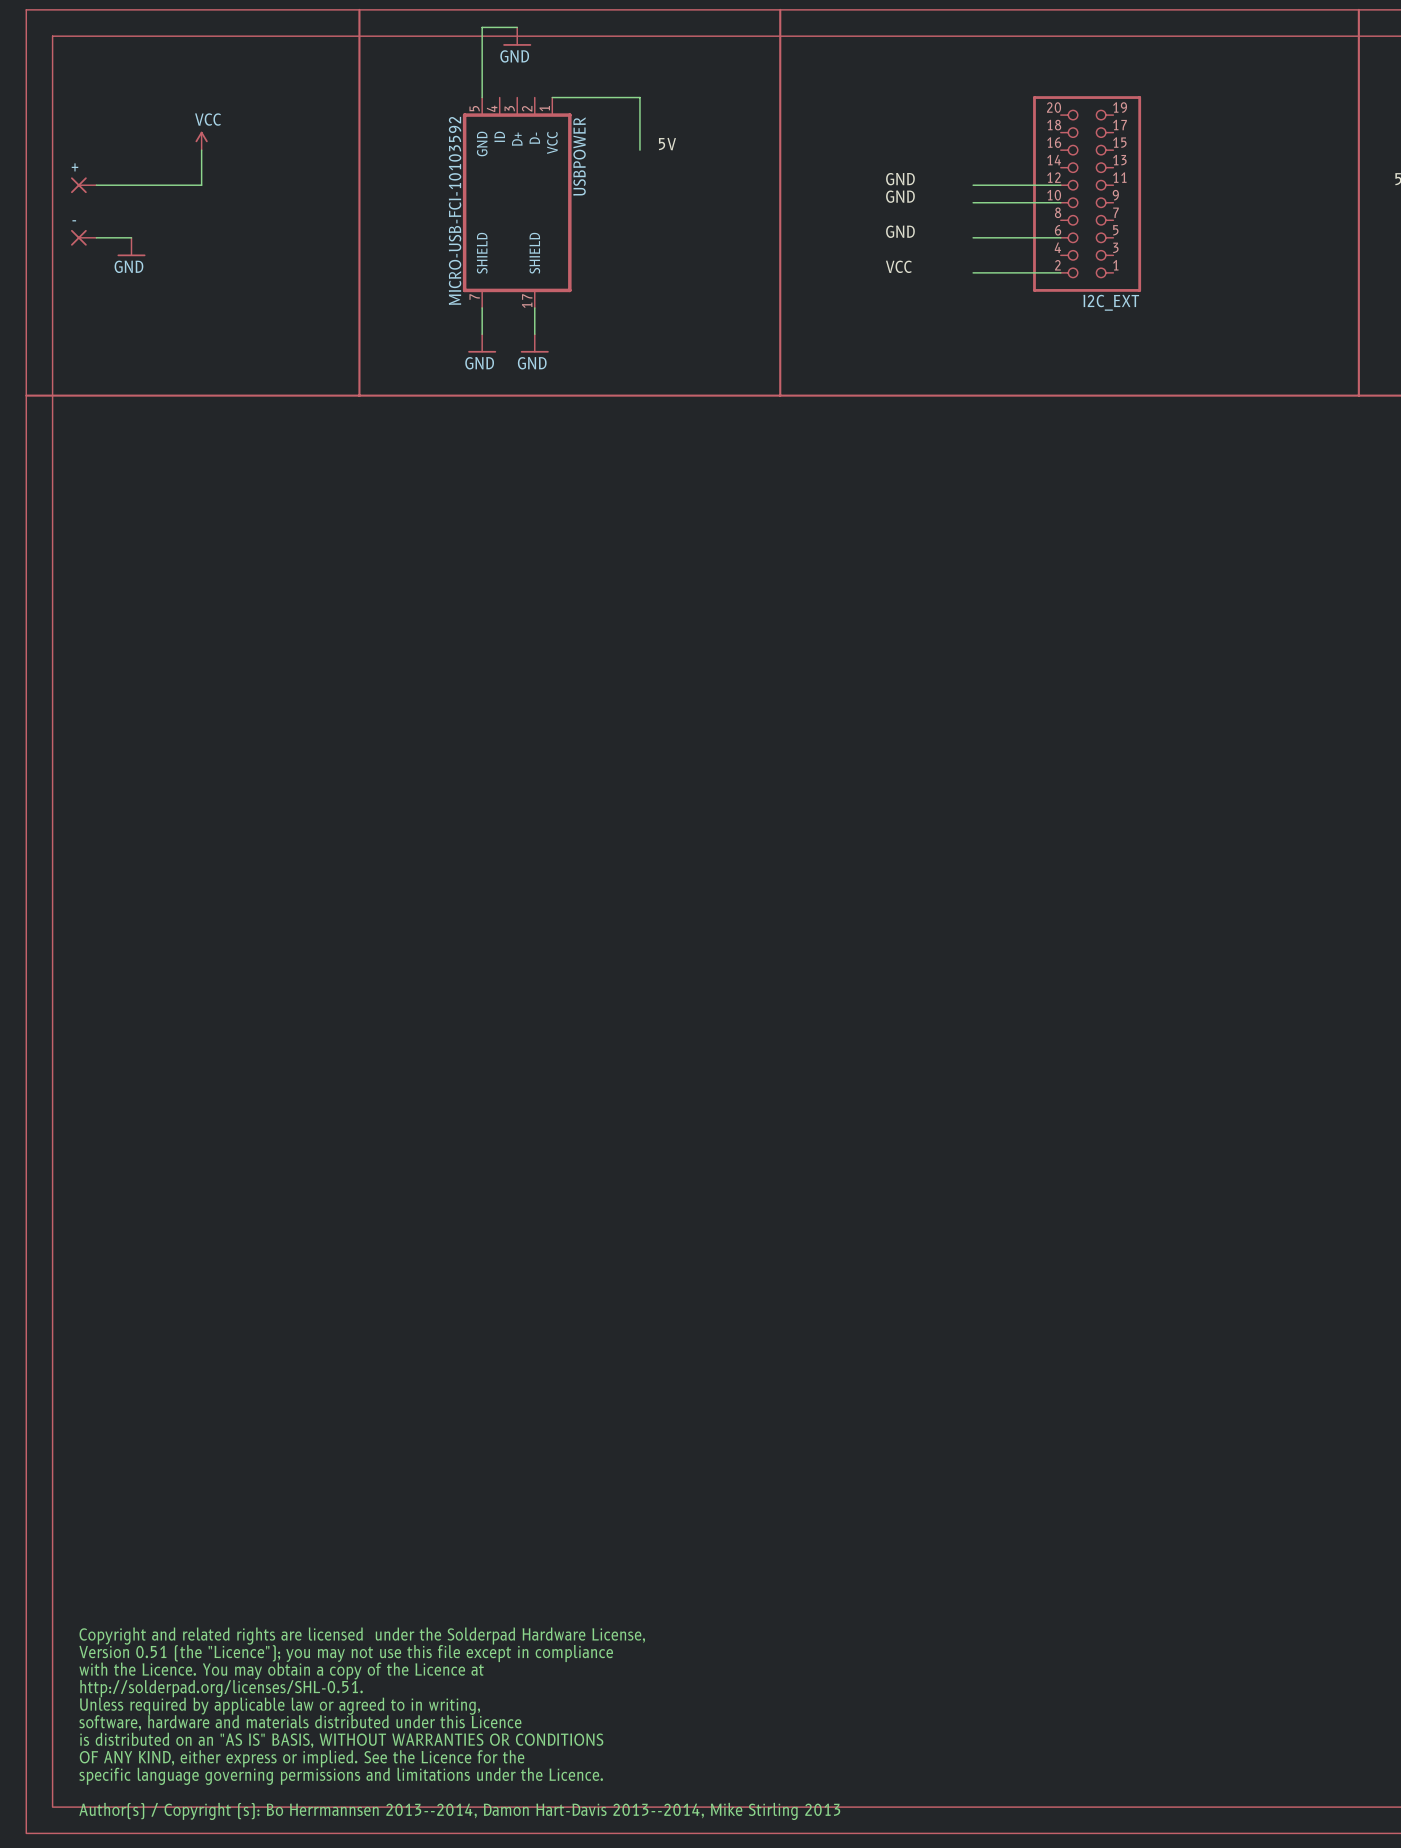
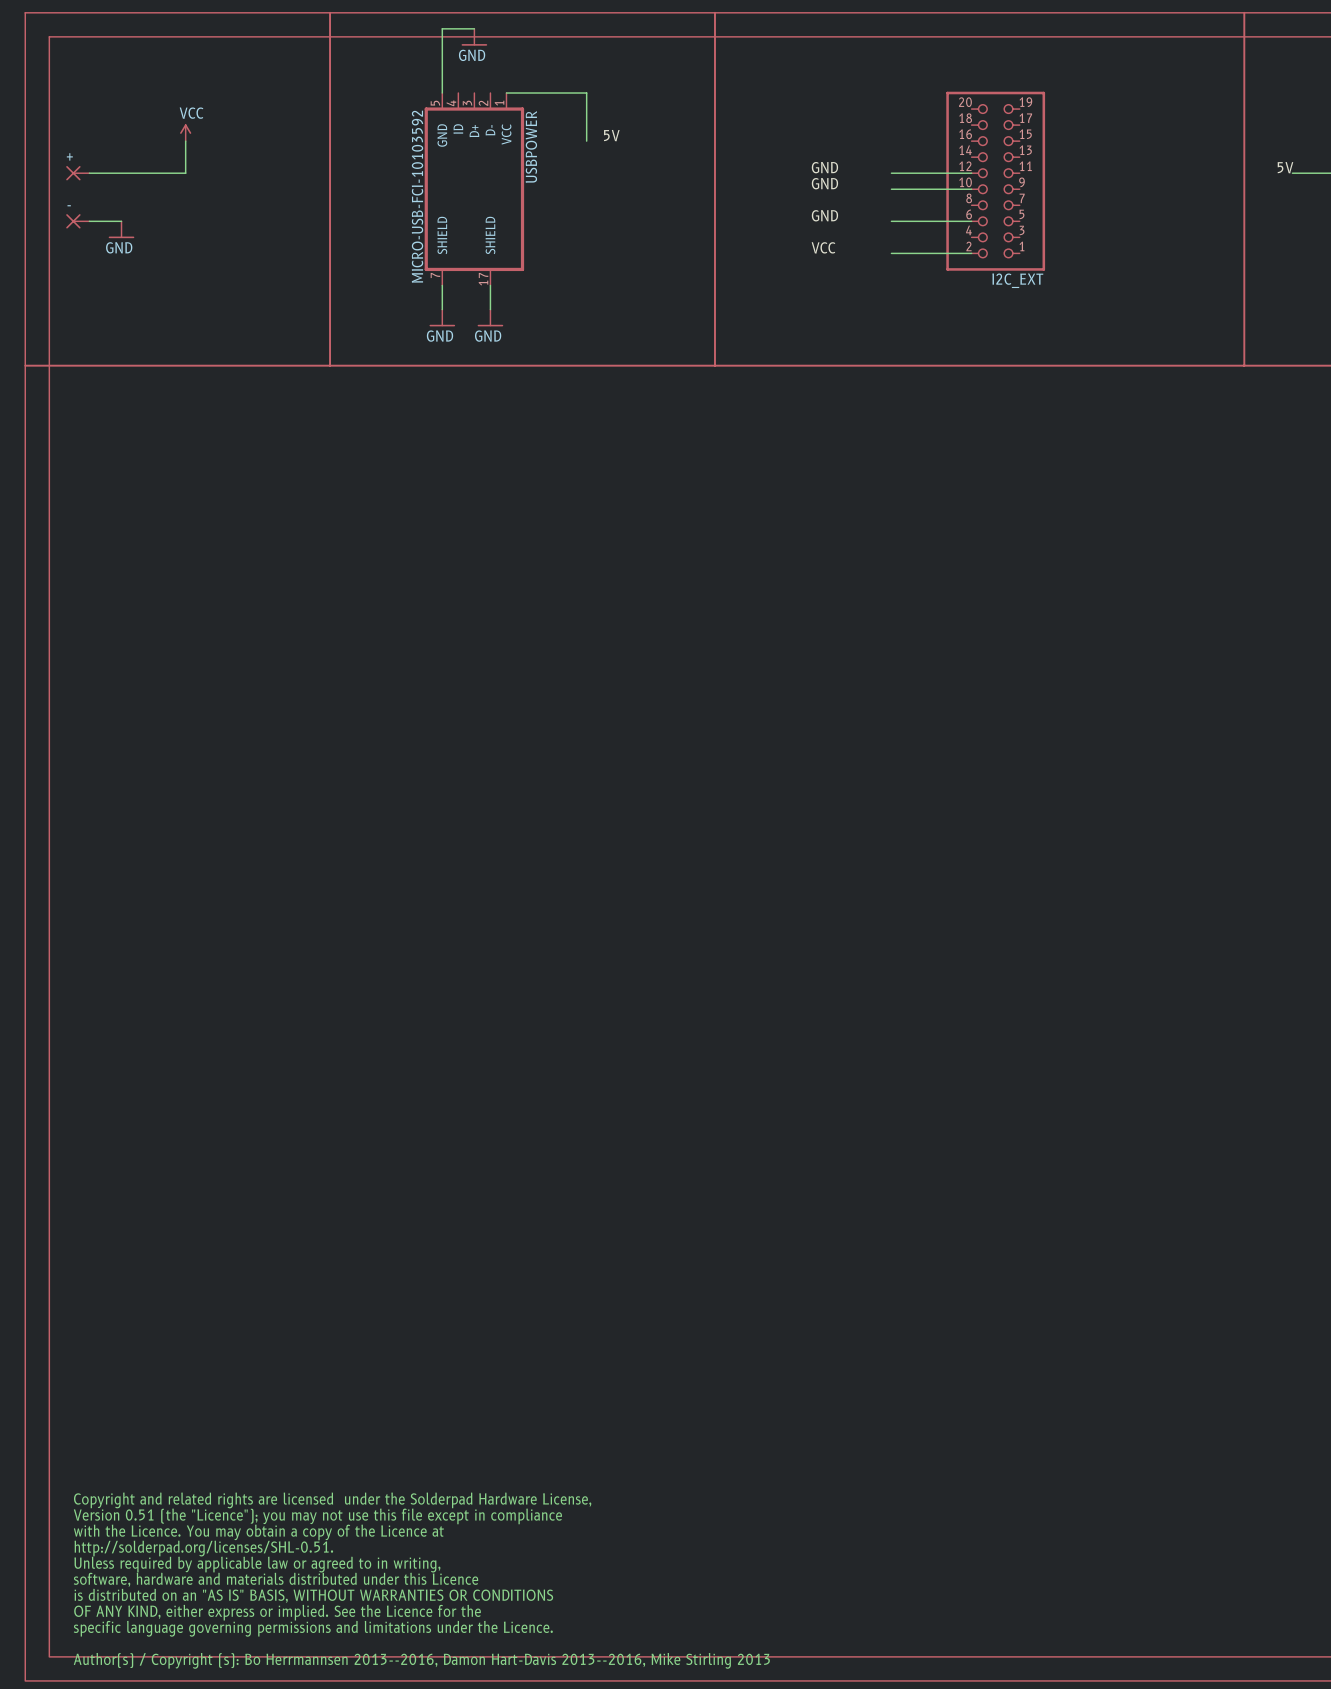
text: Author(s) / Copyright (s): Bo Herrmannsen 2013--2014, Damon Hart-Davis 2013--2014, Mike Stirling 2013 (459, 1811) -> Author(s) / Copyright (s): Bo Herrmannsen 2013--2016, Damon Hart-Davis 2013--2016, Mike Stirling 2013 (421, 1660)

